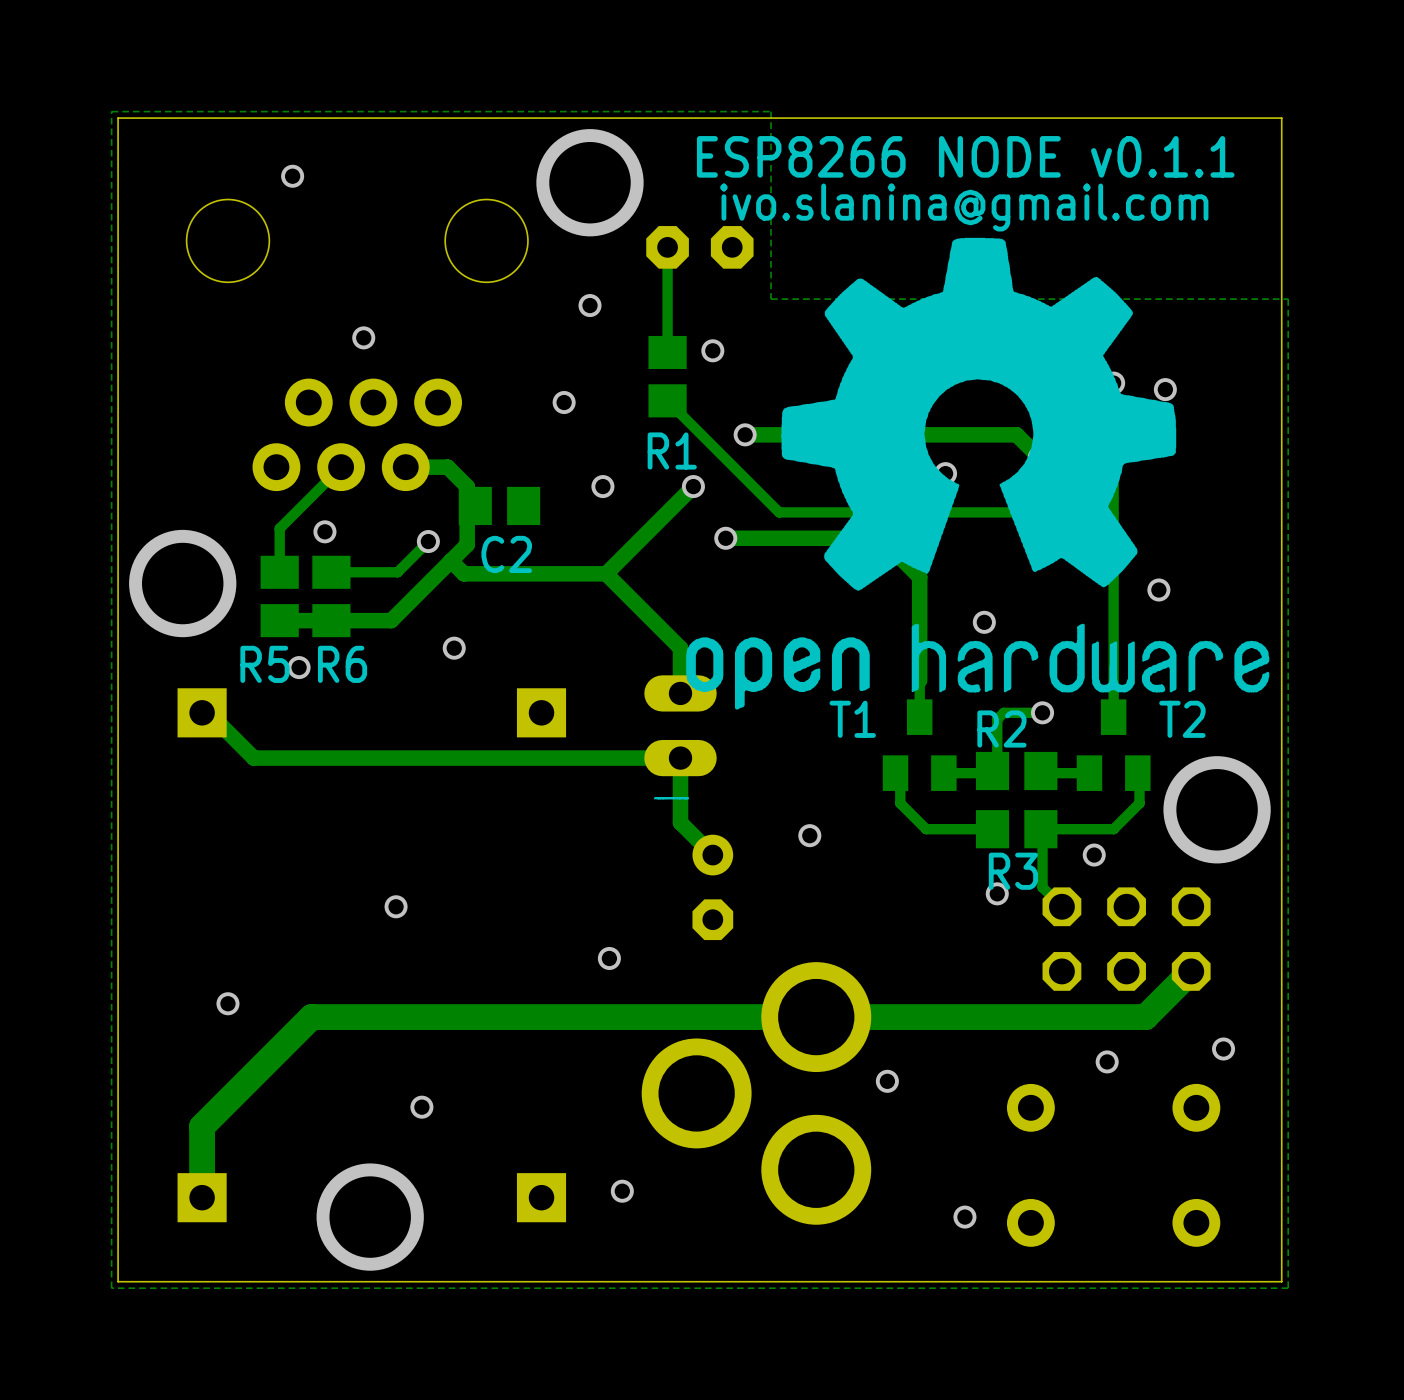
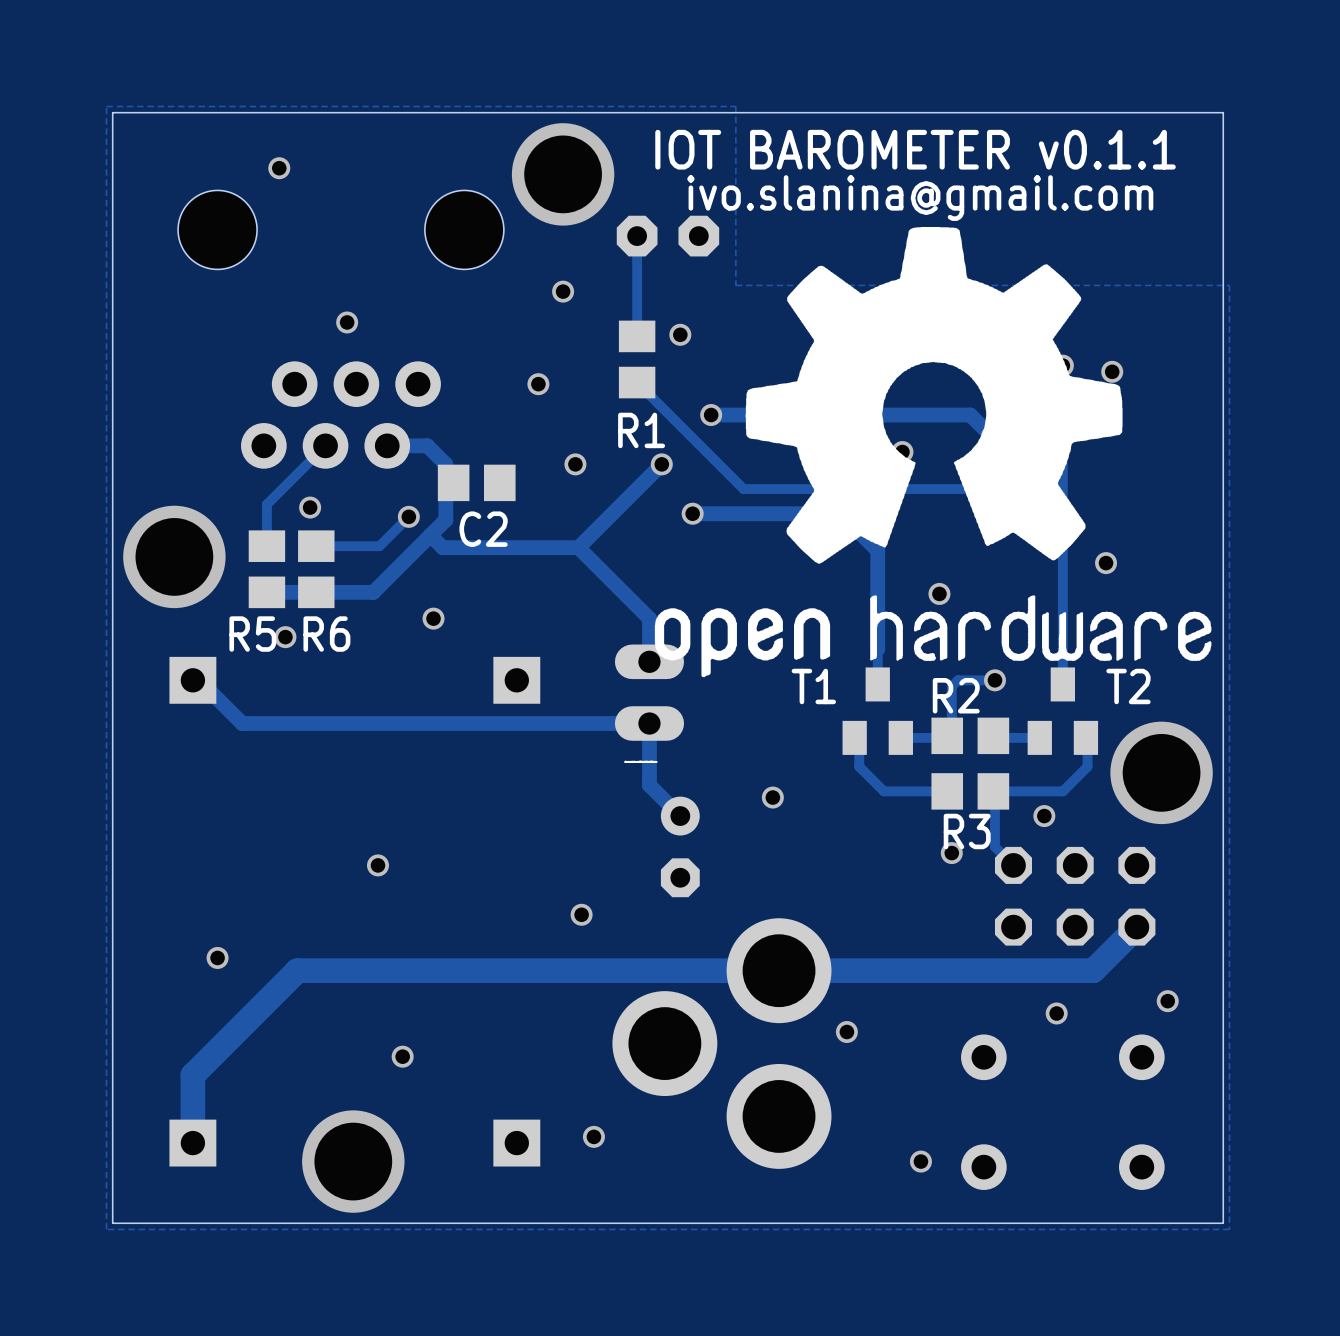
text: ESP8266 NODE v0.1.1 (965, 156) -> IOT BAROMETER v0.1.1 (915, 149)

